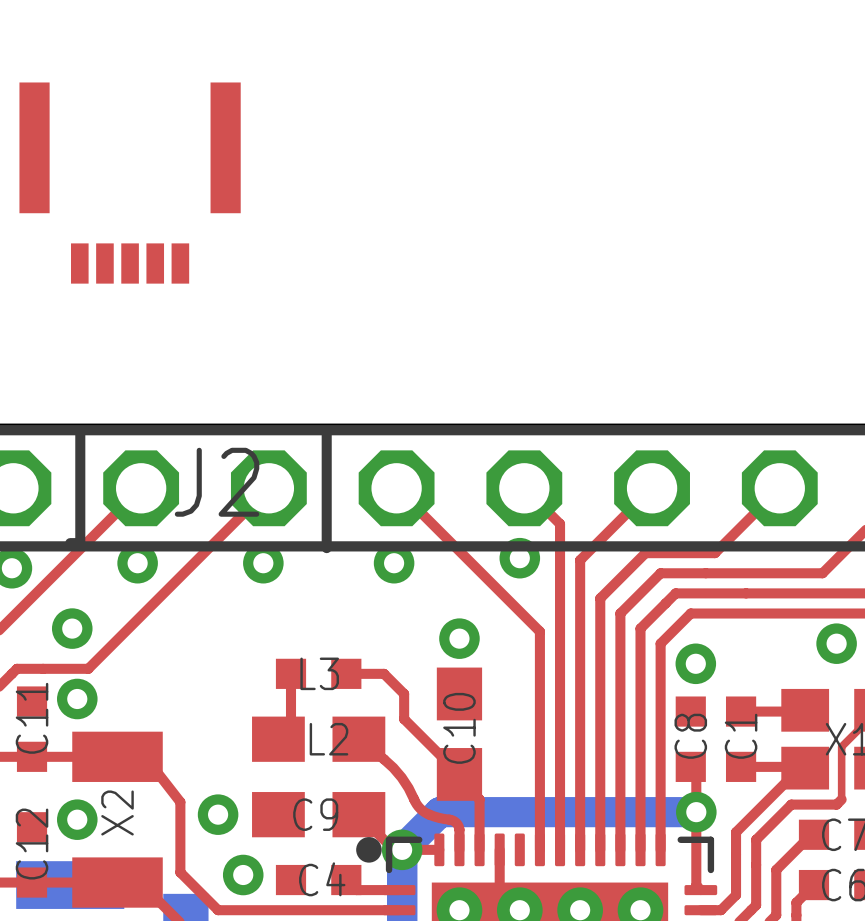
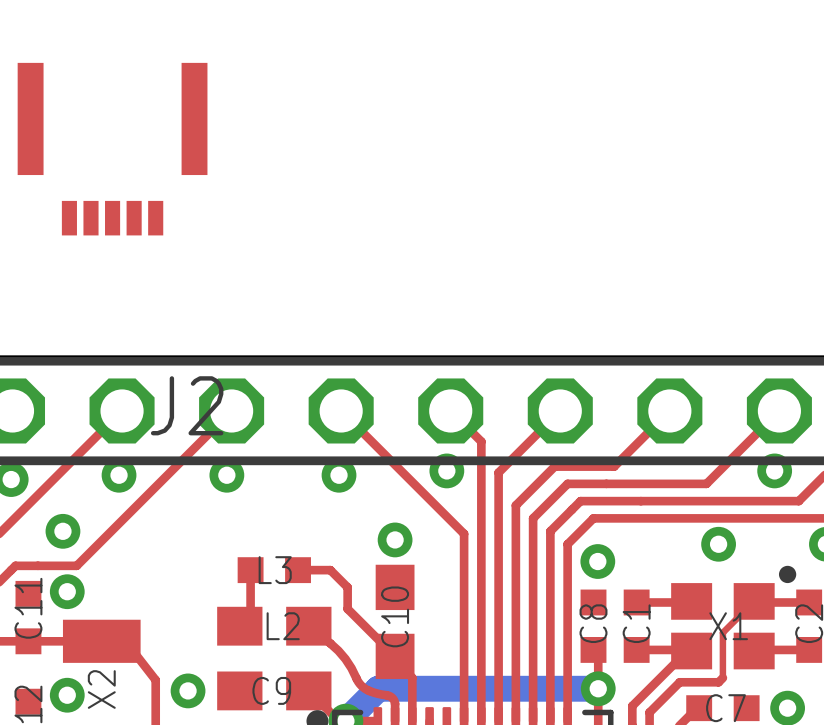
line: (80, 432) (80, 543) (70, 543) -> none
line: (326, 432) (326, 548) -> none

